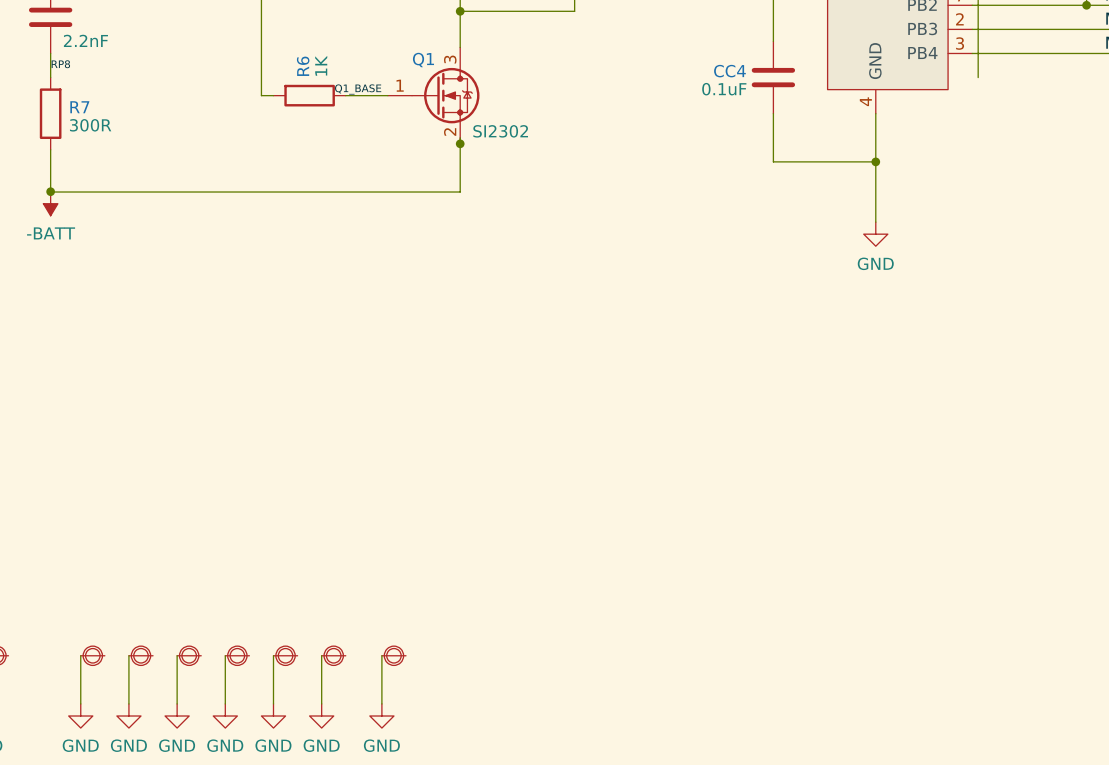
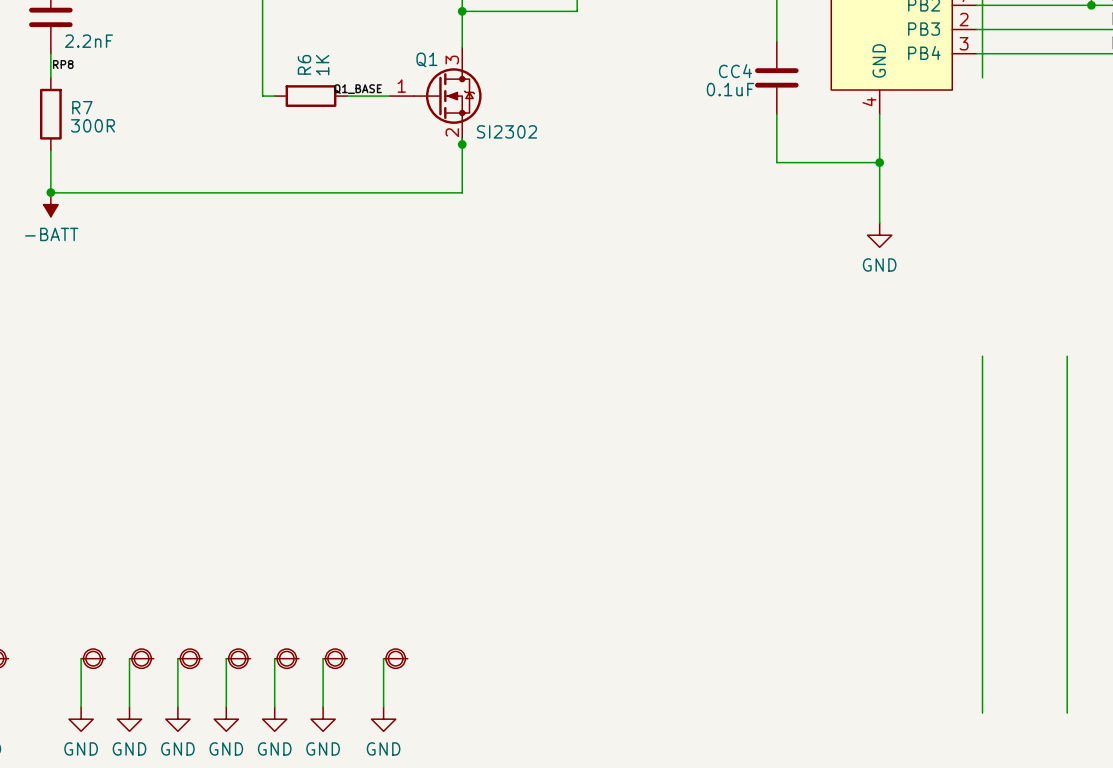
wire: none -> (982, 356) (982, 713)
wire: none -> (1067, 356) (1067, 713)

